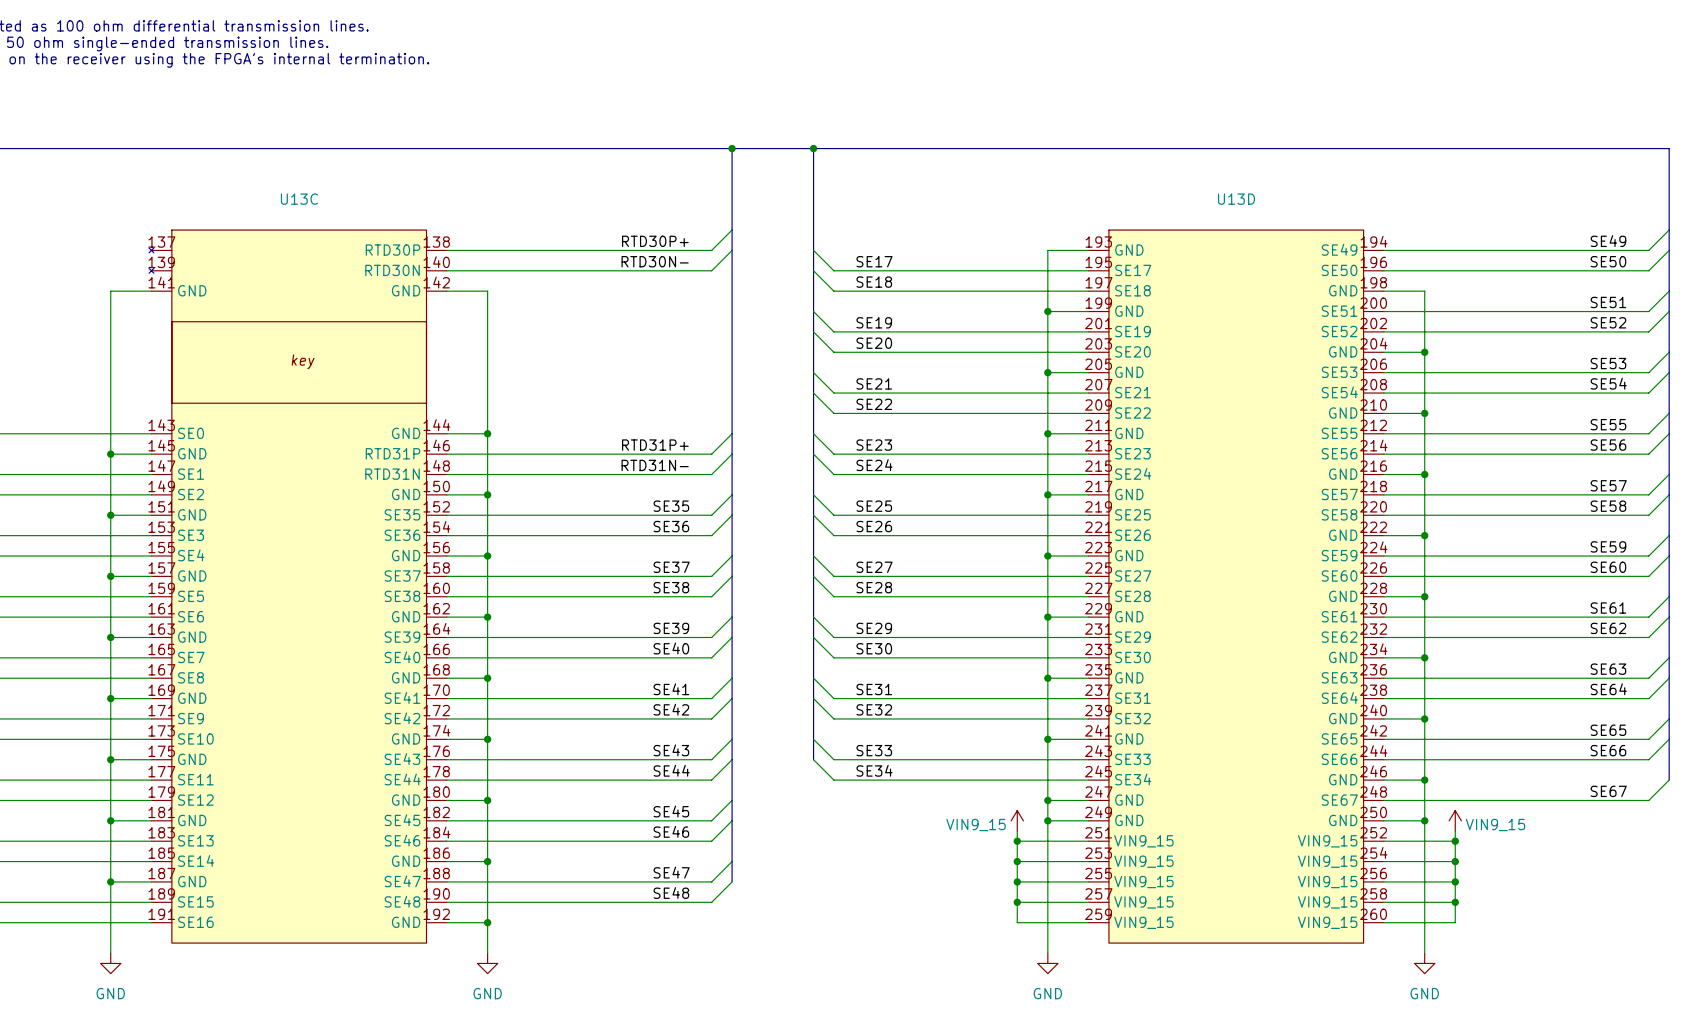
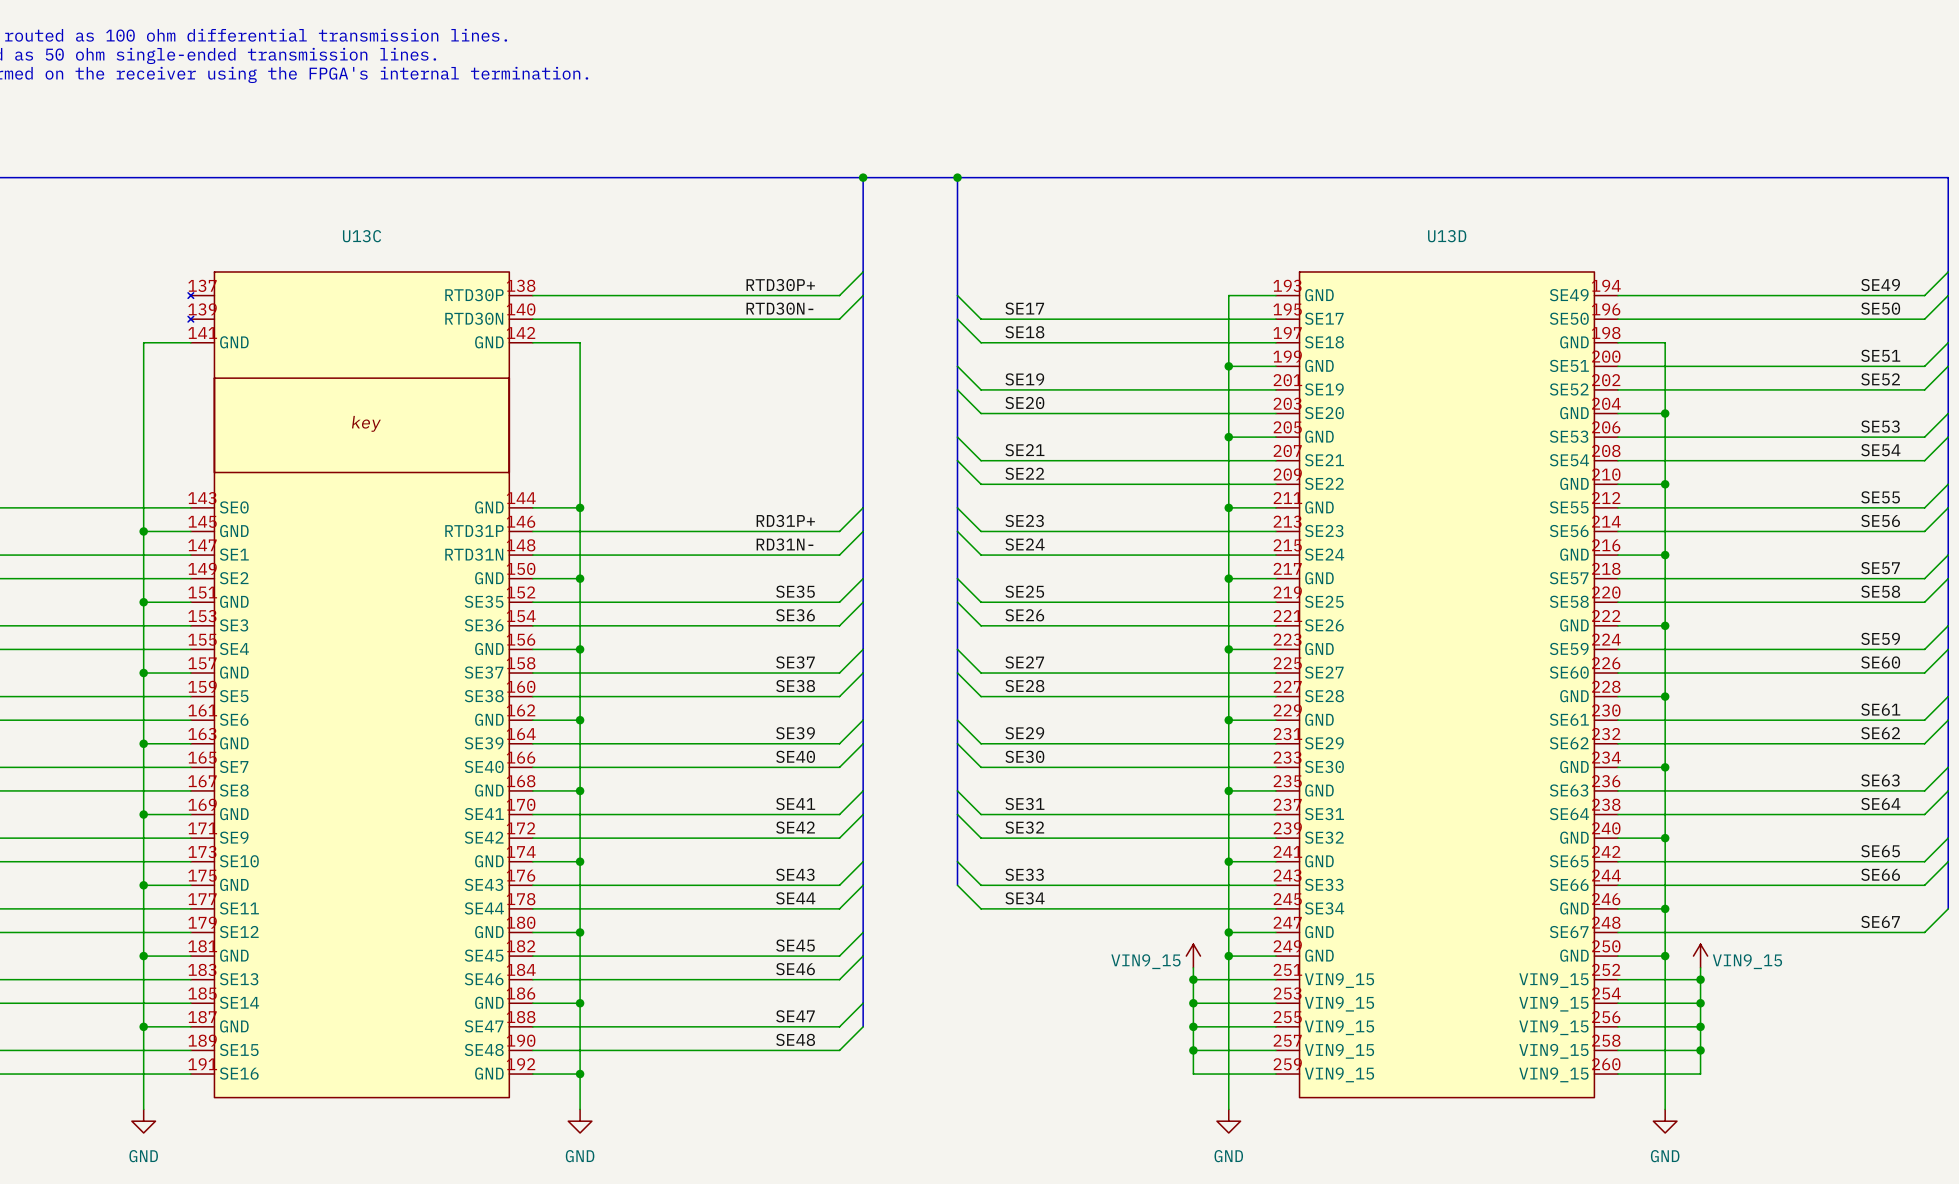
label: RTD31P+ (655, 445) -> RD31P+ (785, 520)
label: RTD31N- (655, 465) -> RD31N- (785, 544)

